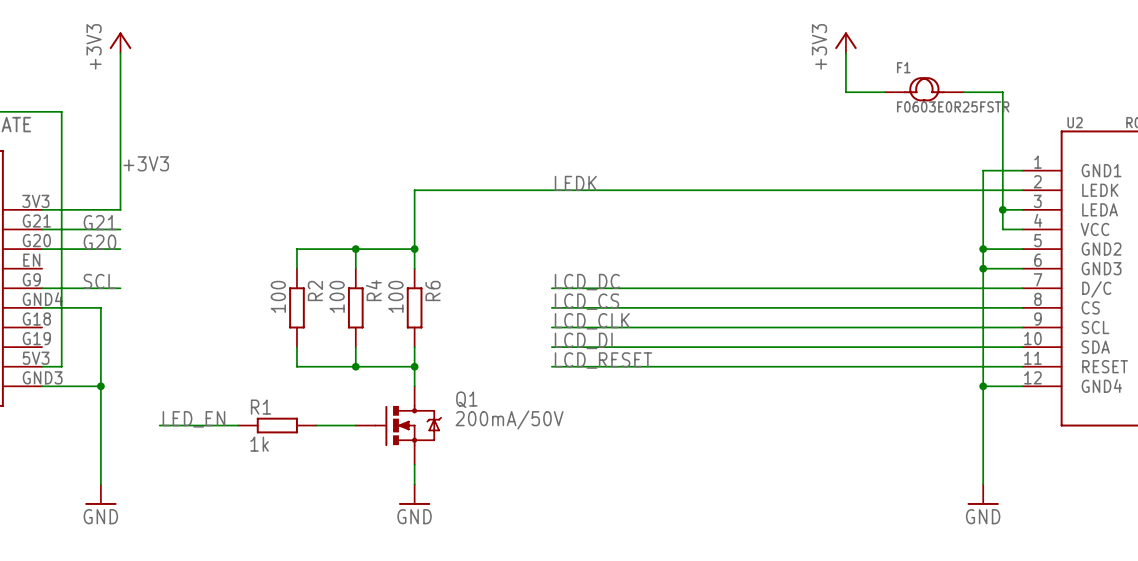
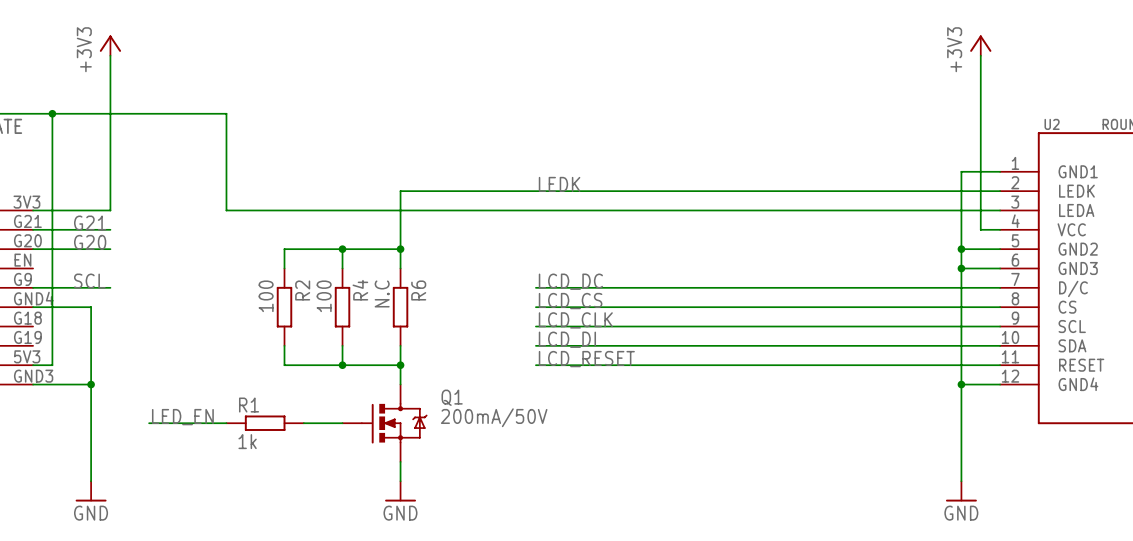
power symbol position: +3V3 (845, 42) -> +3V3 (980, 45)
wire: (845, 53) (845, 92) (885, 92) -> none
F1: F0603E0R25FSTR (924, 89) -> none
wire: (963, 92) (1002, 92) -> (980, 55) (980, 94)
wire: none -> (52, 113) (226, 113) (226, 210) (980, 210)
junction: none -> (52, 113)
label: +3V3 (146, 163) -> none
junction: (1002, 209) -> none
R6 value: 100 (395, 296) -> N.C (382, 293)

